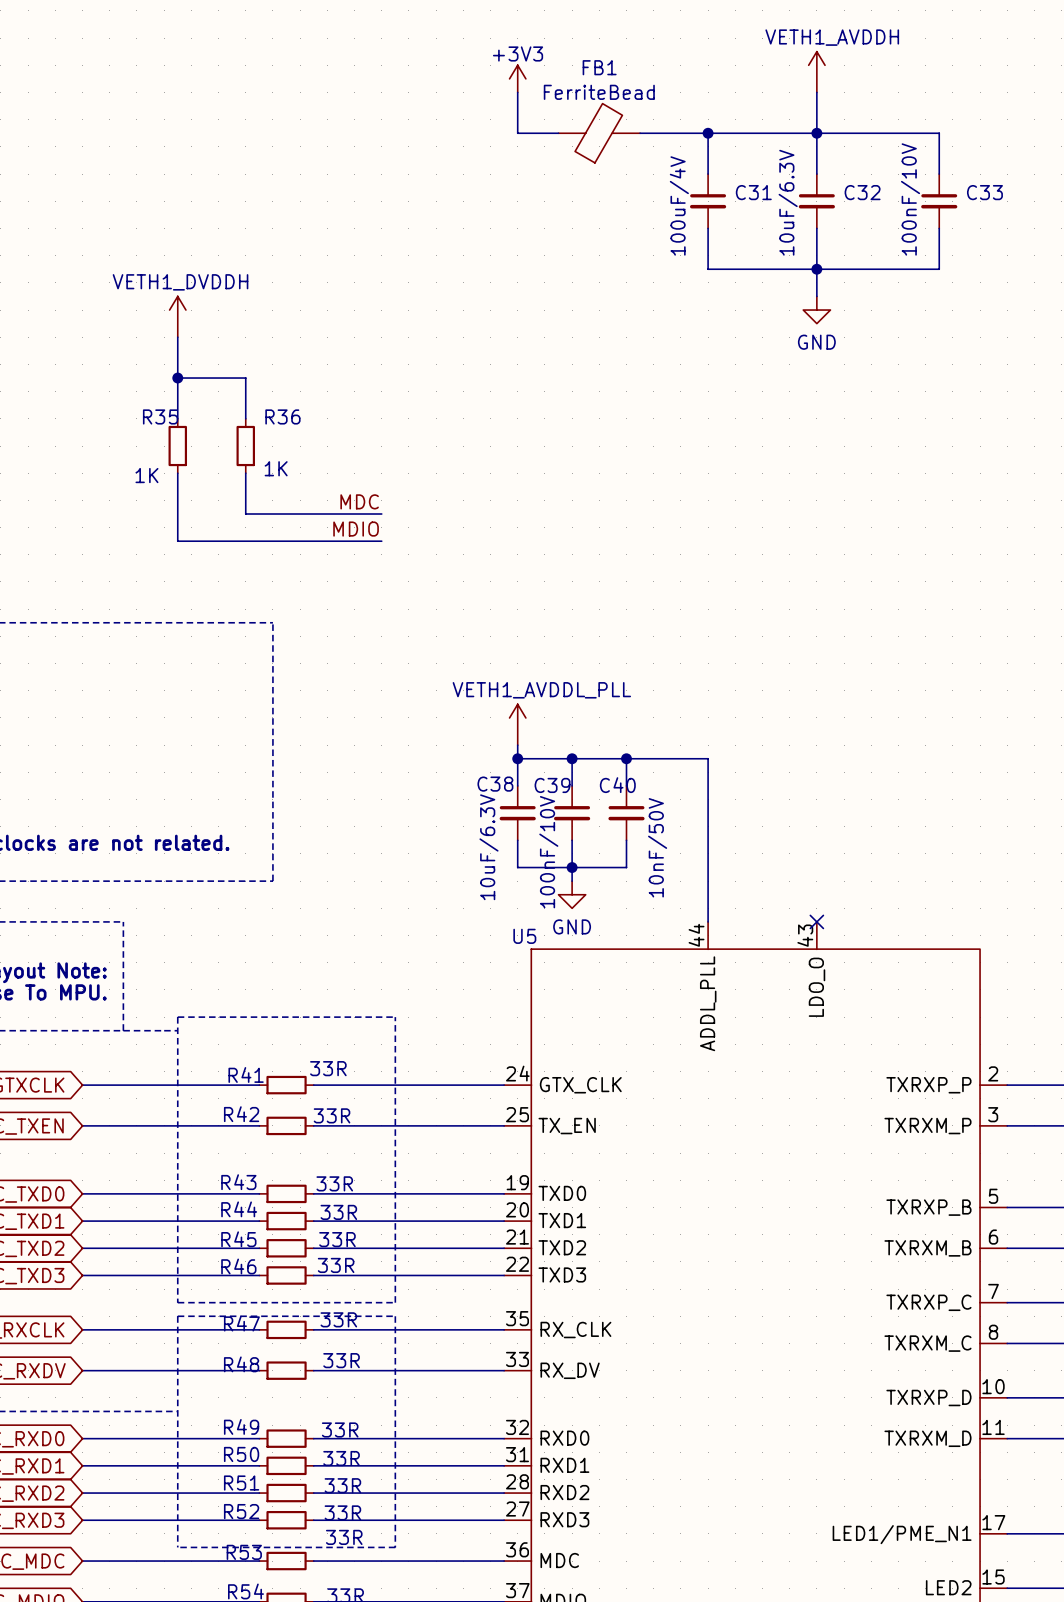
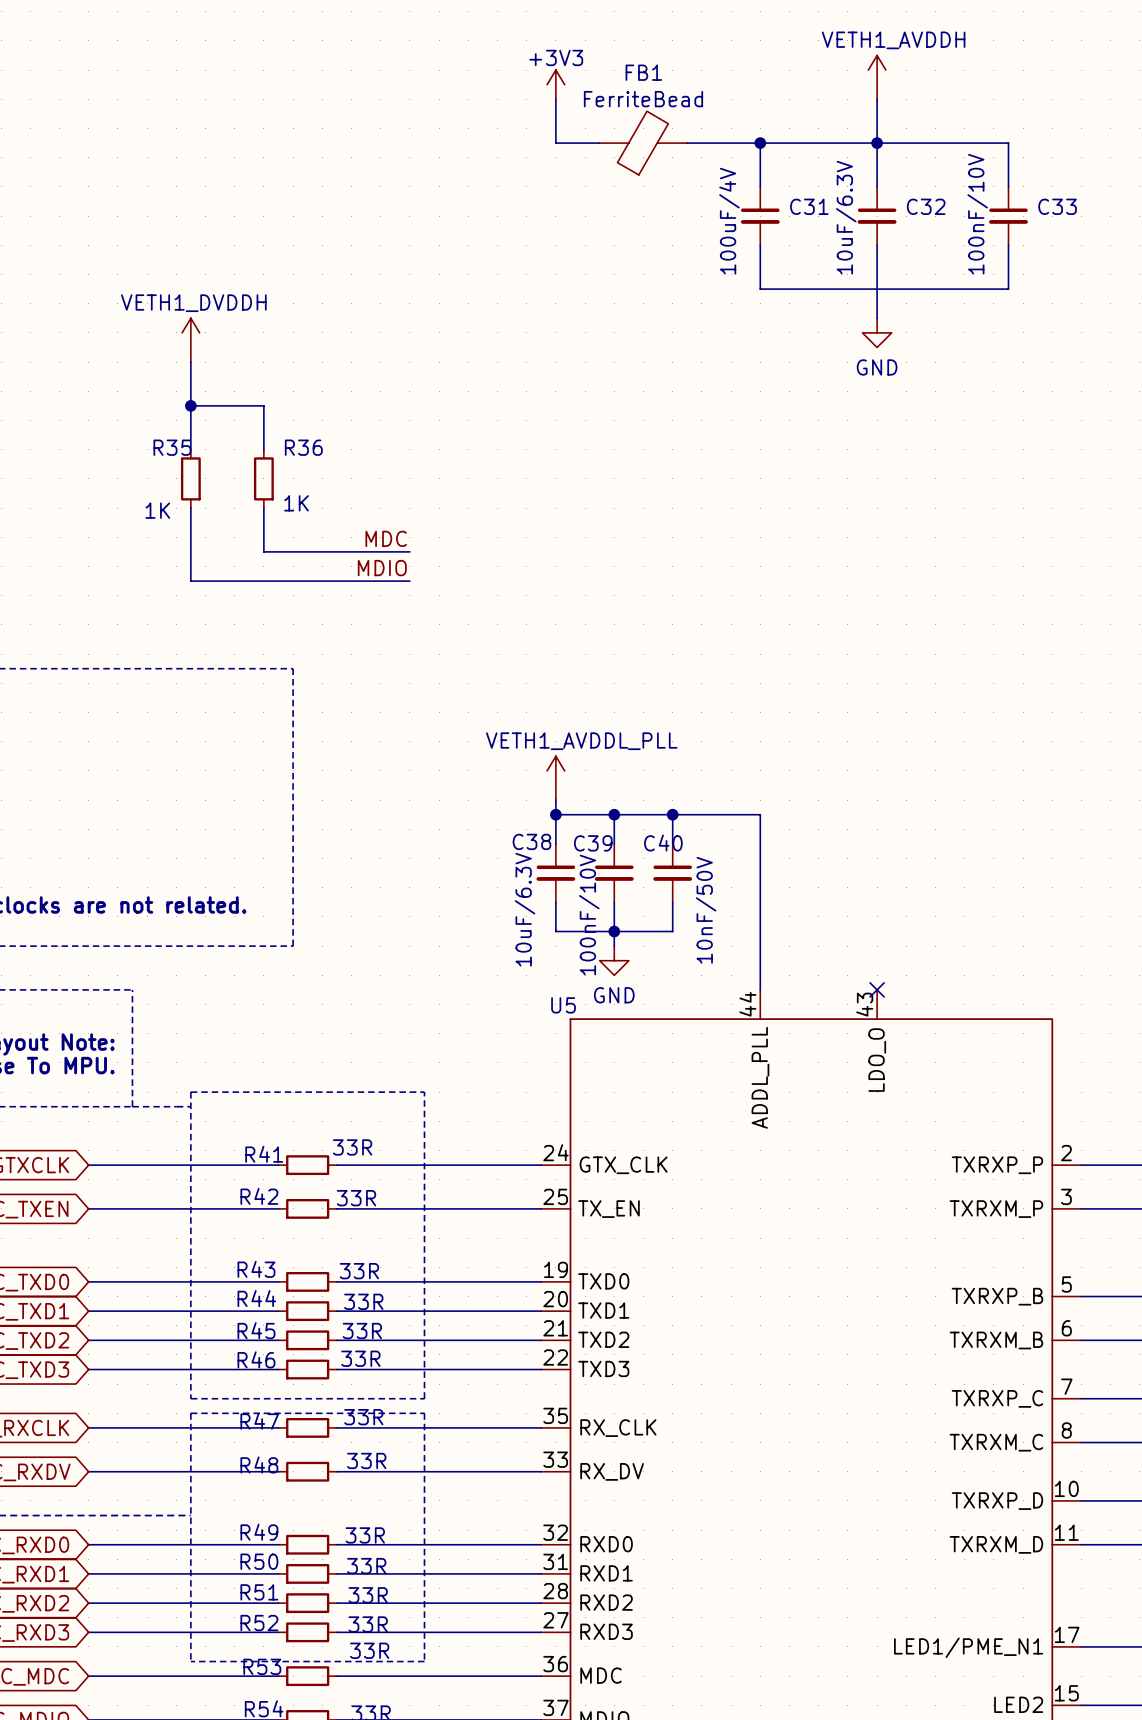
junction: (816, 269) -> none

